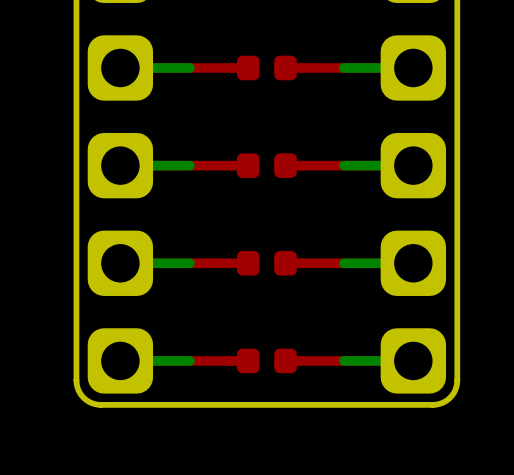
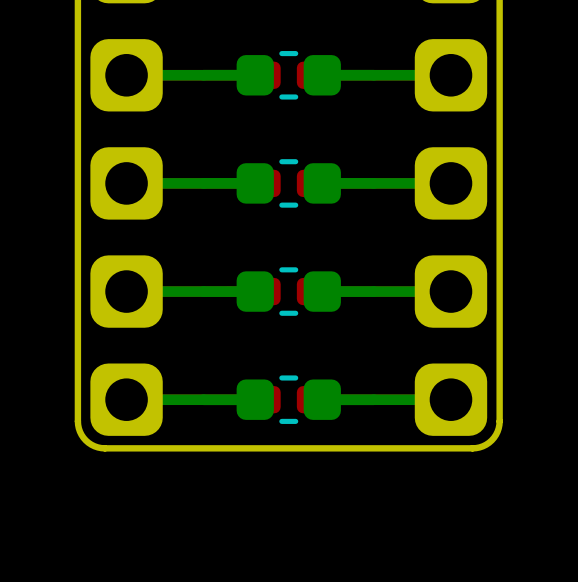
bottom track: none -> (255, 75) (203, 75)
part: none -> (288, 75)
bottom track: none -> (373, 75) (322, 75)
bottom track: none -> (255, 183) (203, 183)
part: none -> (288, 183)
bottom track: none -> (373, 183) (322, 183)
bottom track: none -> (255, 291) (203, 291)
part: none -> (288, 291)
bottom track: none -> (373, 291) (322, 291)
bottom track: none -> (255, 399) (203, 399)
part: none -> (288, 399)
bottom track: none -> (373, 399) (322, 399)

